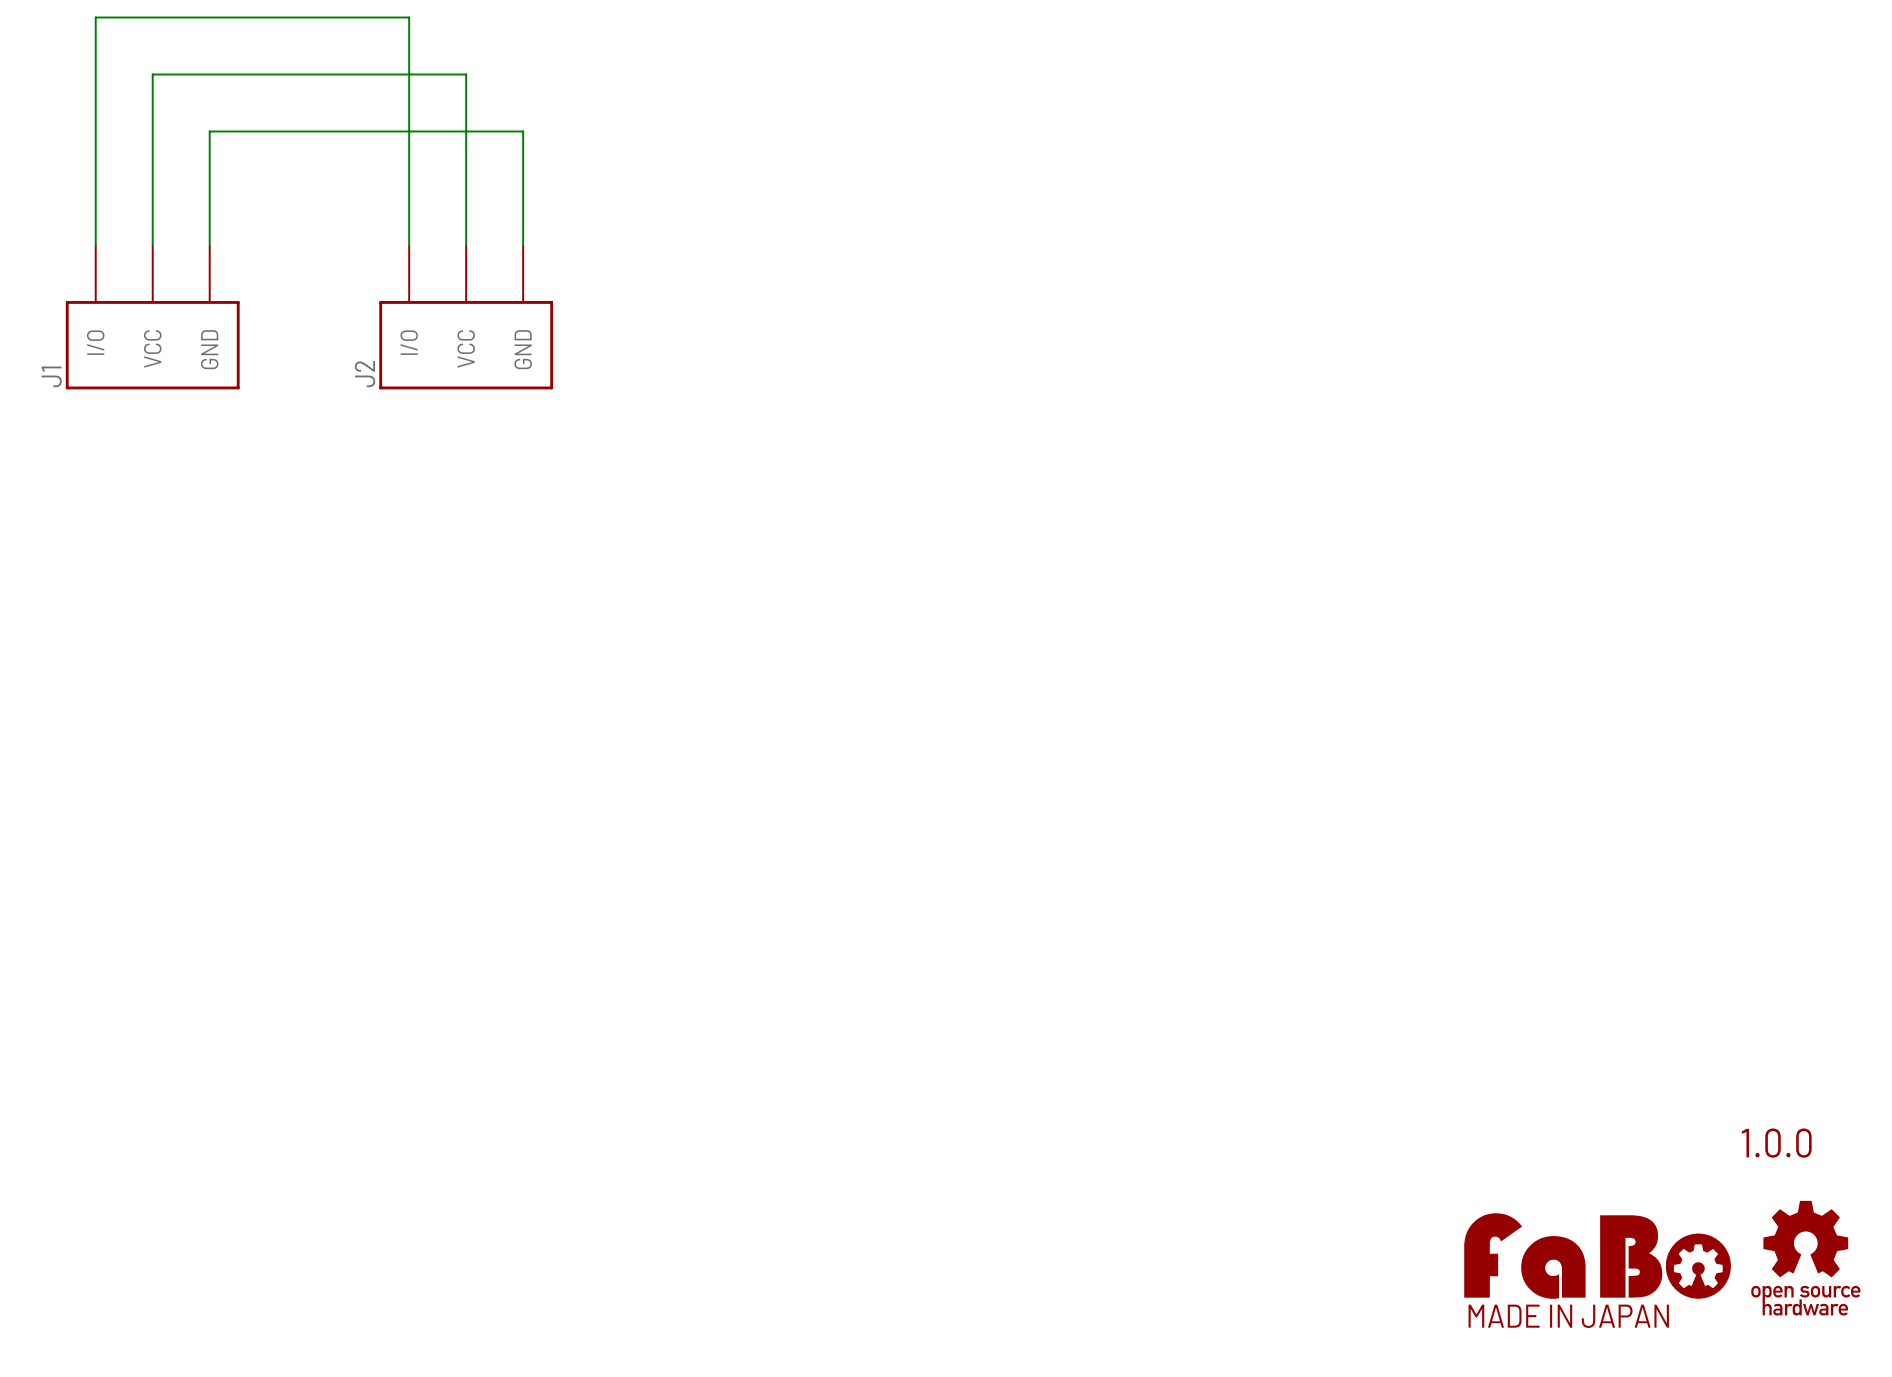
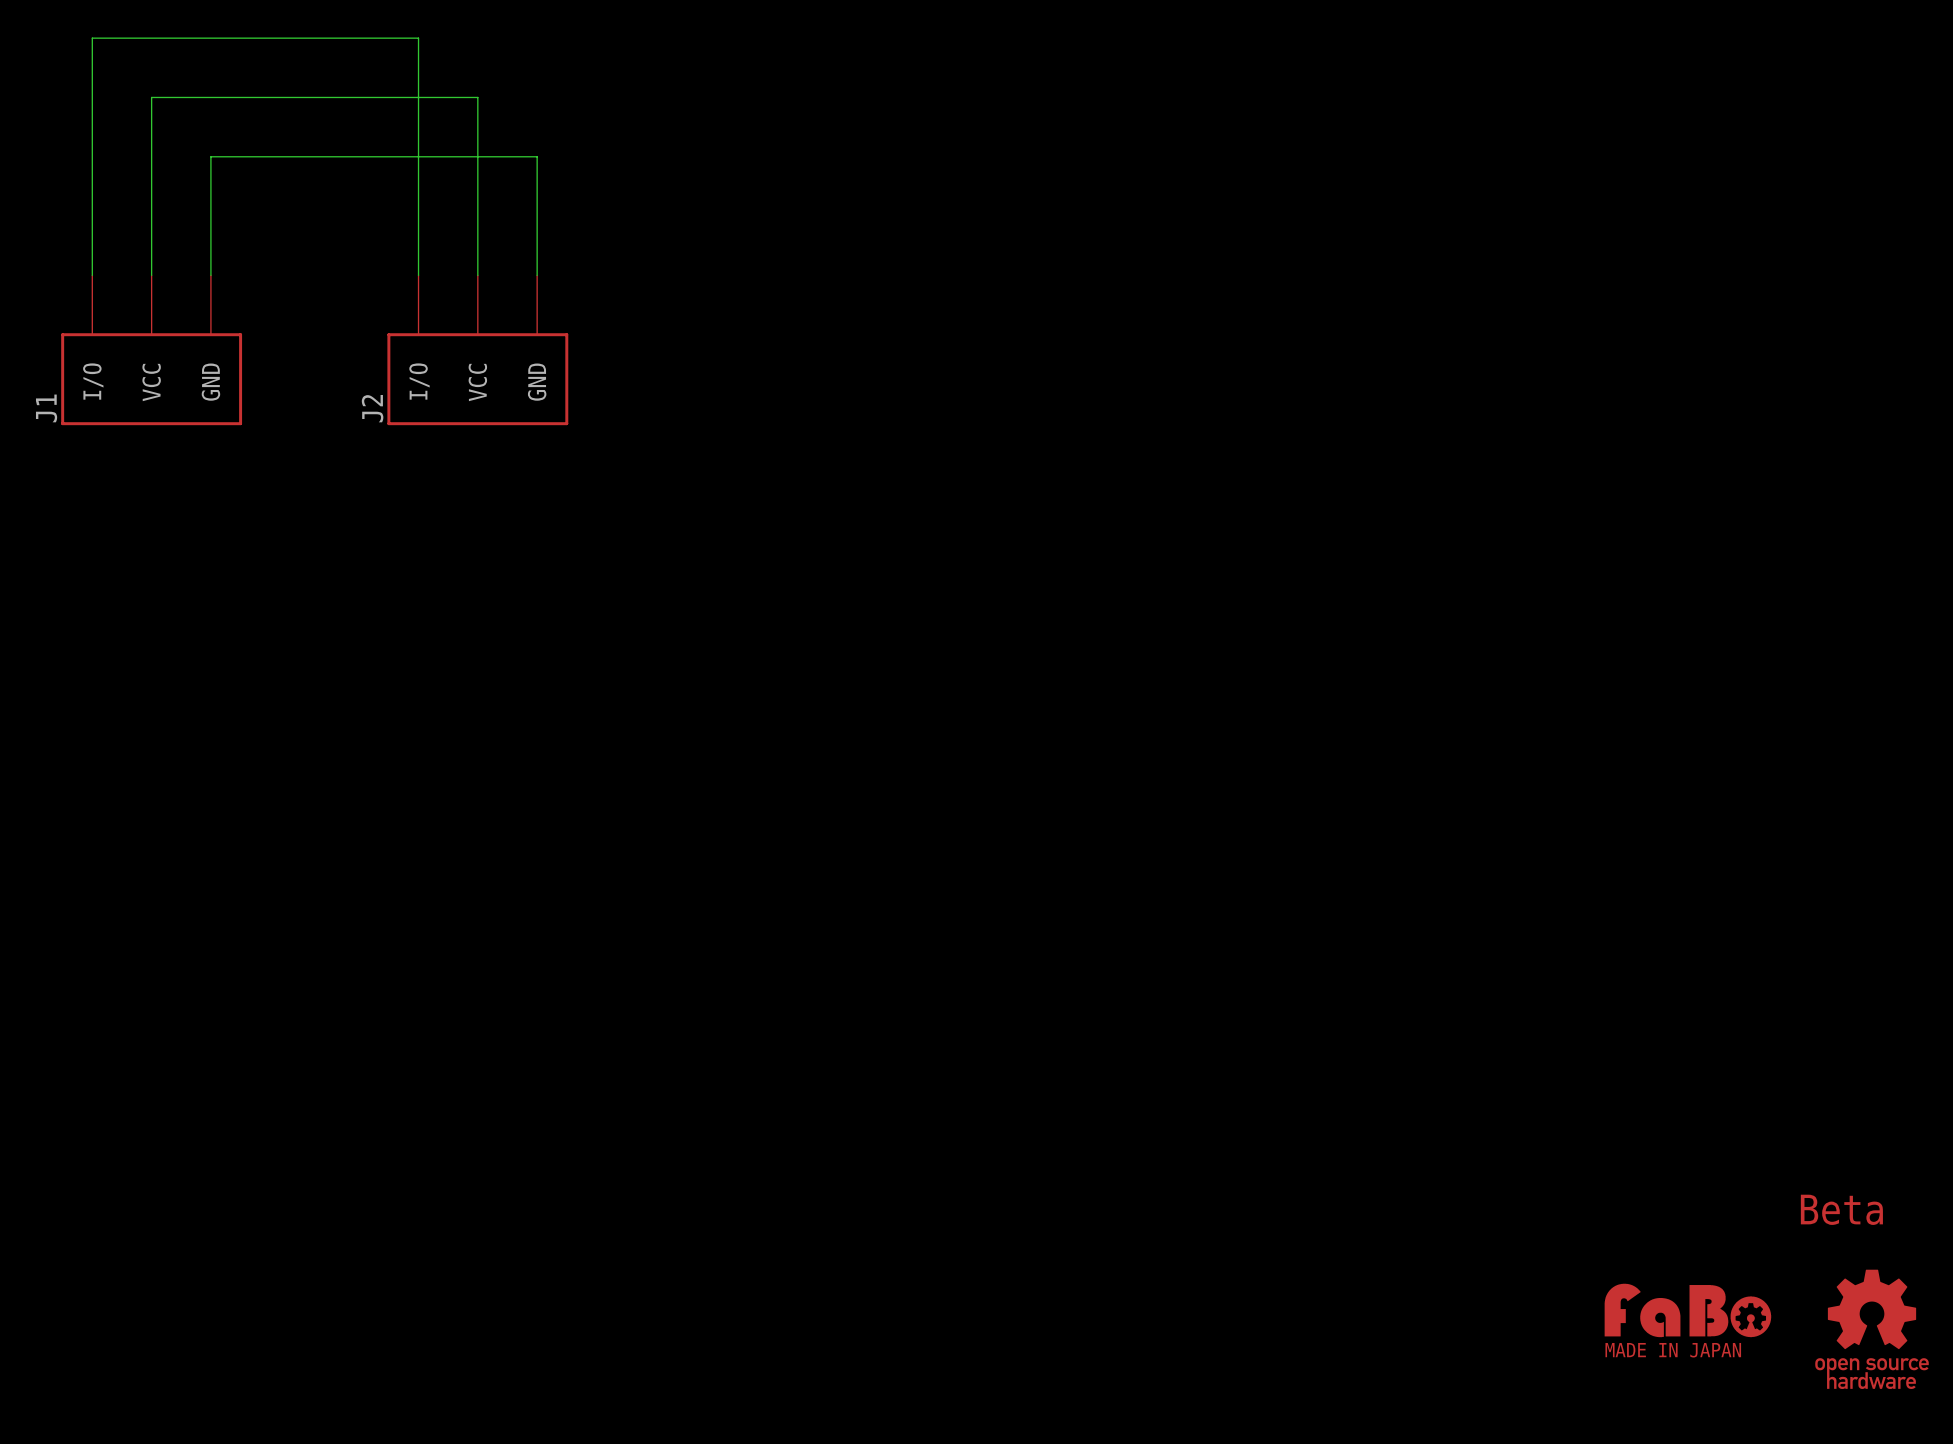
text: 1.0.0 (1776, 1143) -> Beta (1841, 1209)
part: none -> (1687, 1310)
part: (1597, 1256) -> none

